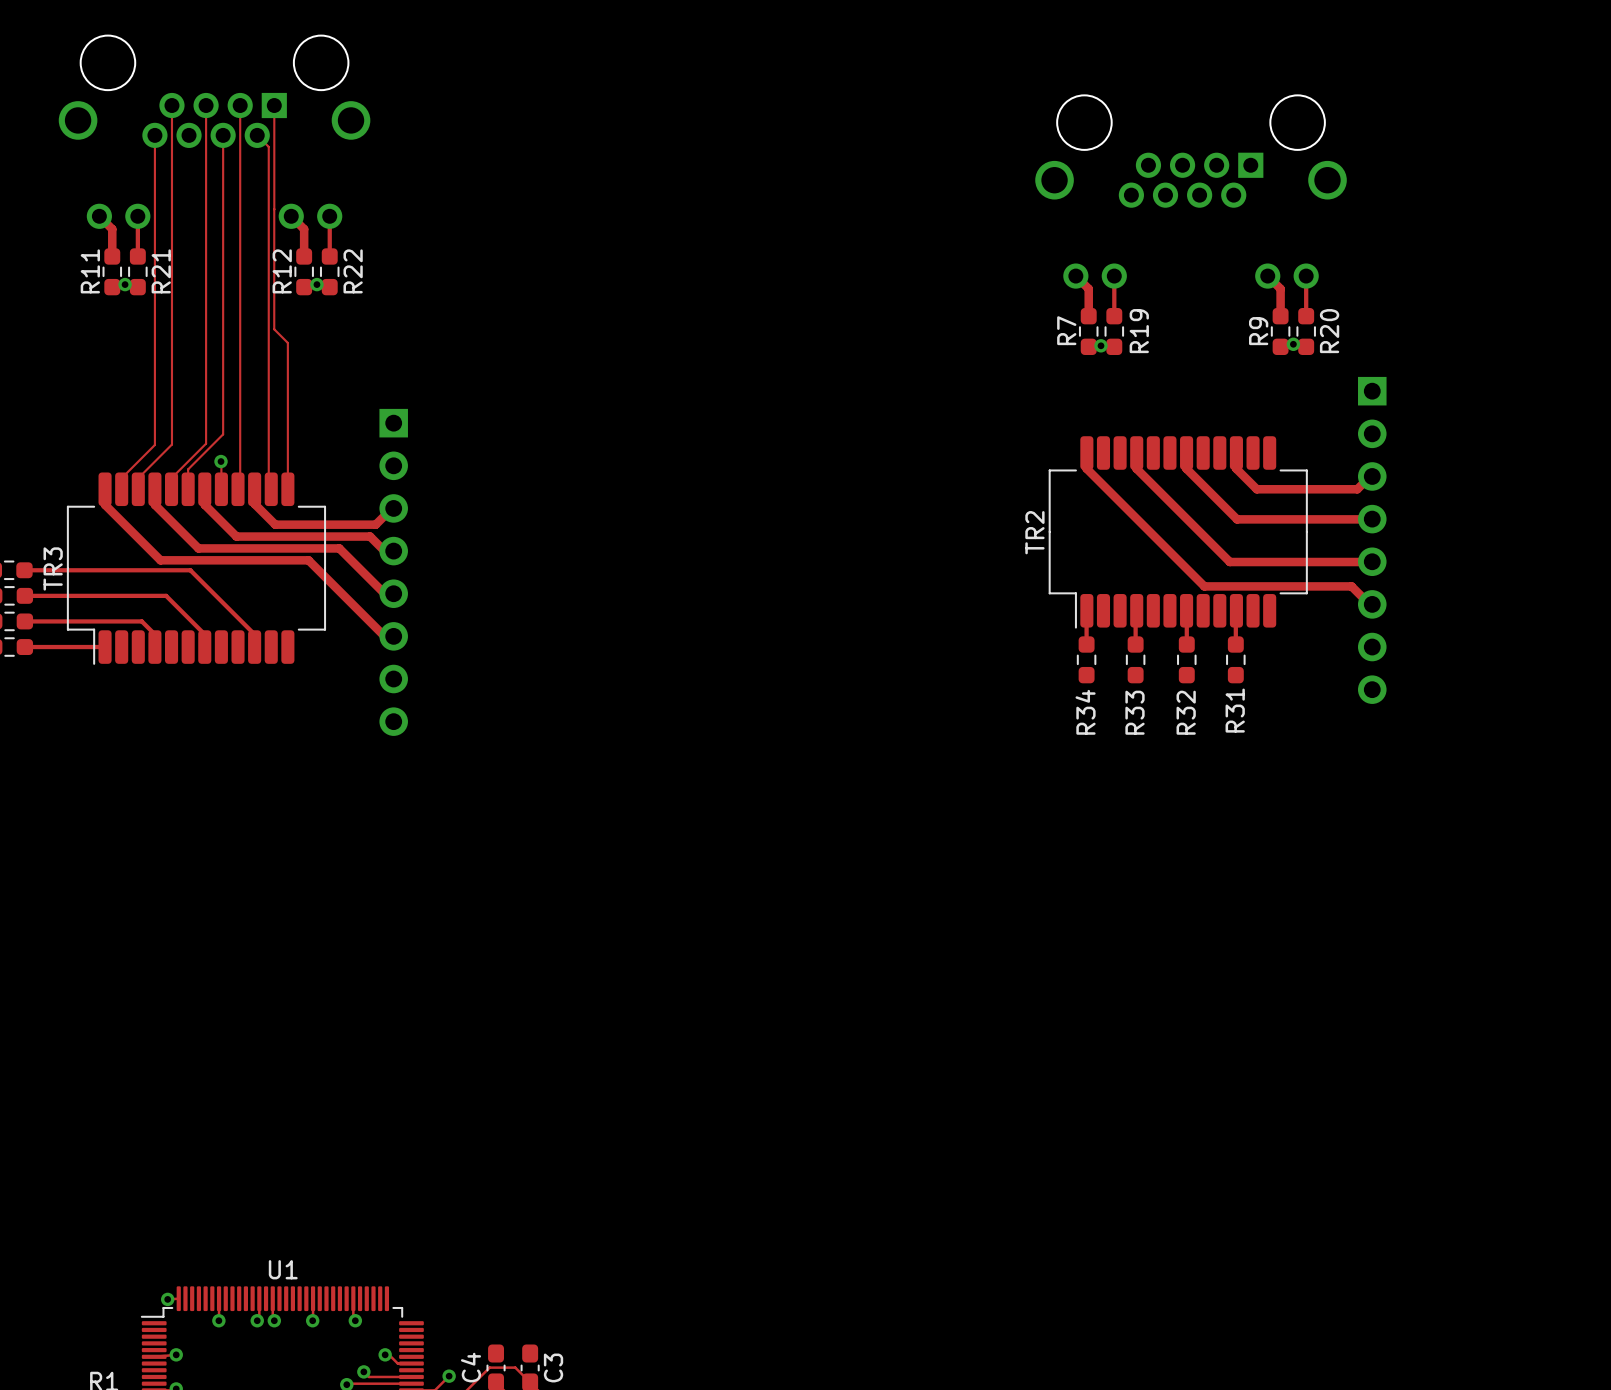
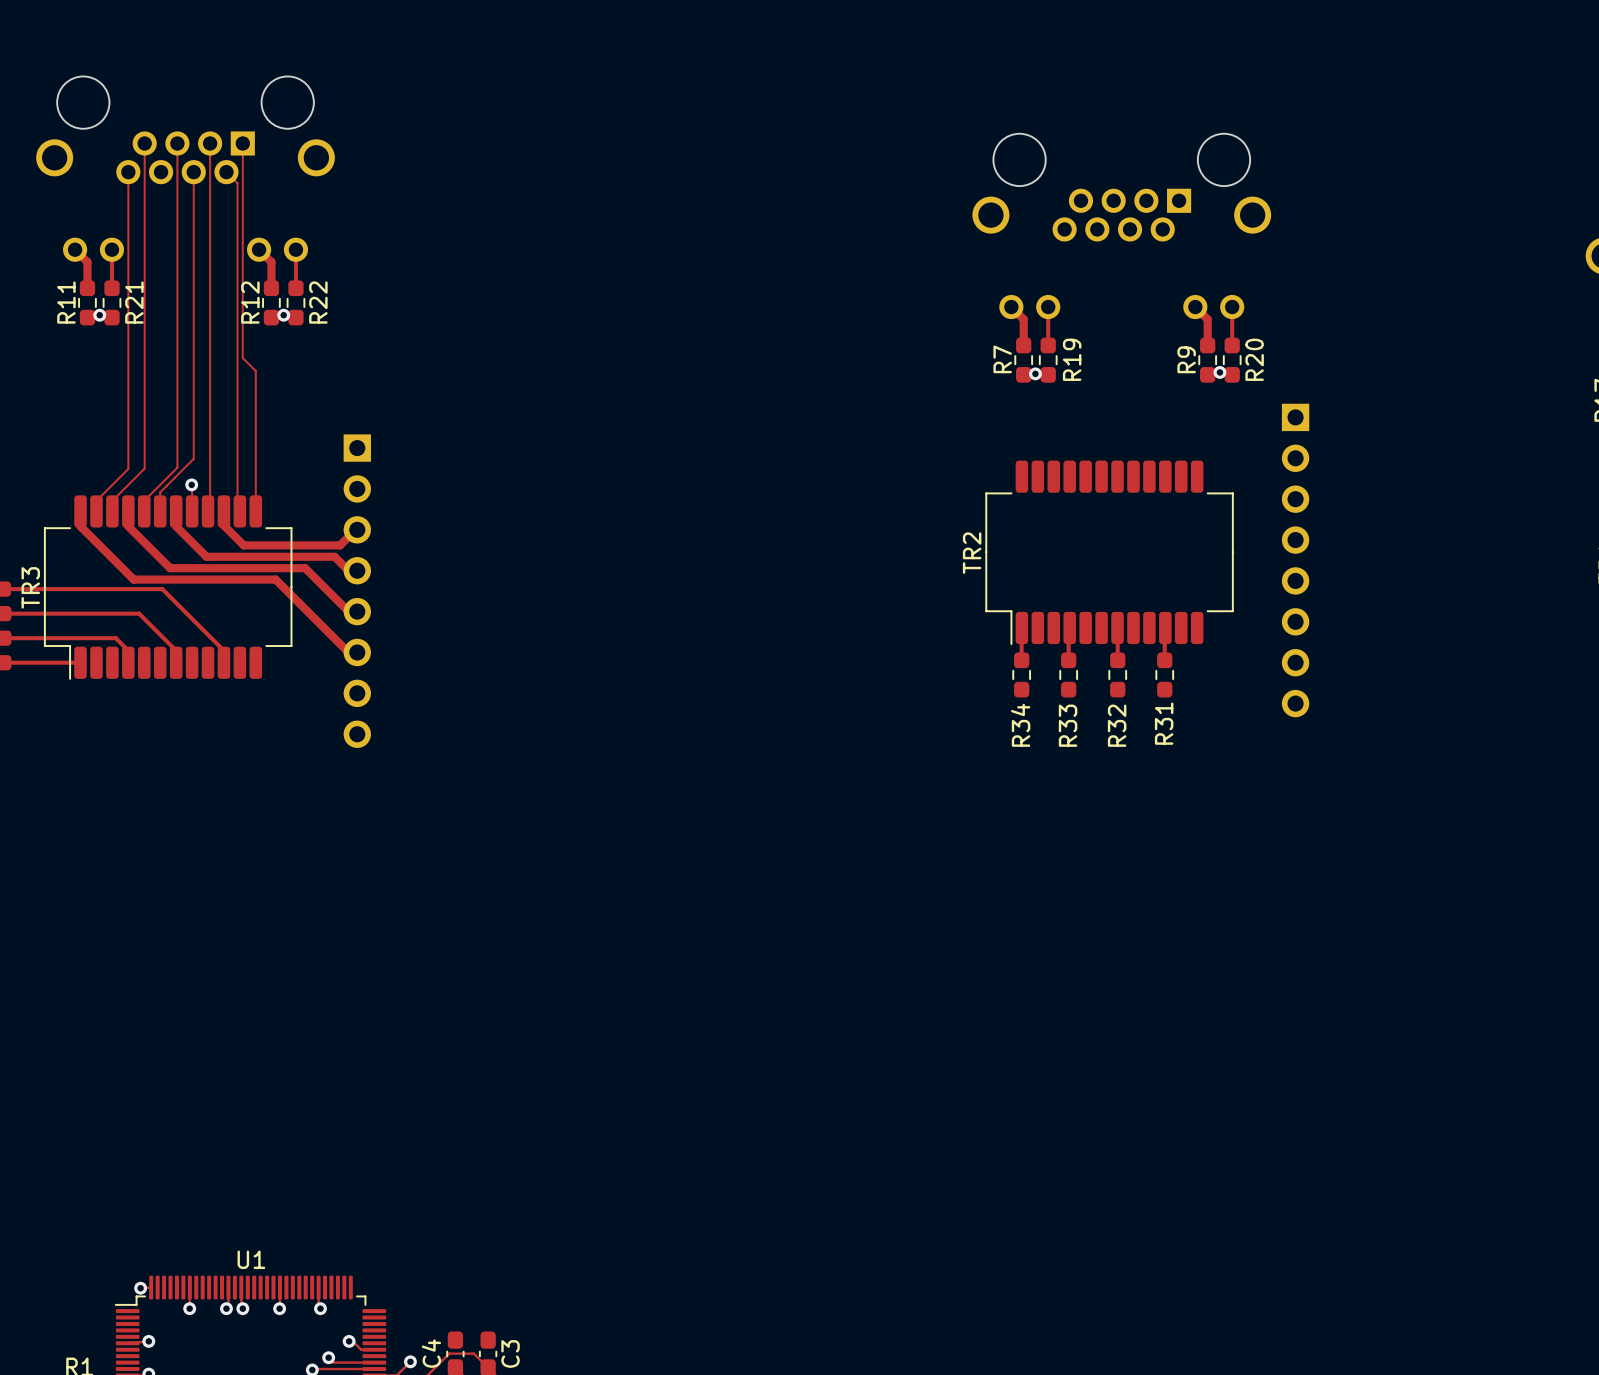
track: (1086, 453) (1086, 468) (1204, 586) (1351, 586) (1369, 604) -> none
track: (1136, 453) (1136, 468) (1229, 562) (1369, 562) -> none
track: (1186, 453) (1186, 468) (1237, 519) (1369, 519) -> none
track: (1236, 453) (1236, 468) (1256, 489) (1357, 489) (1369, 476) -> none

